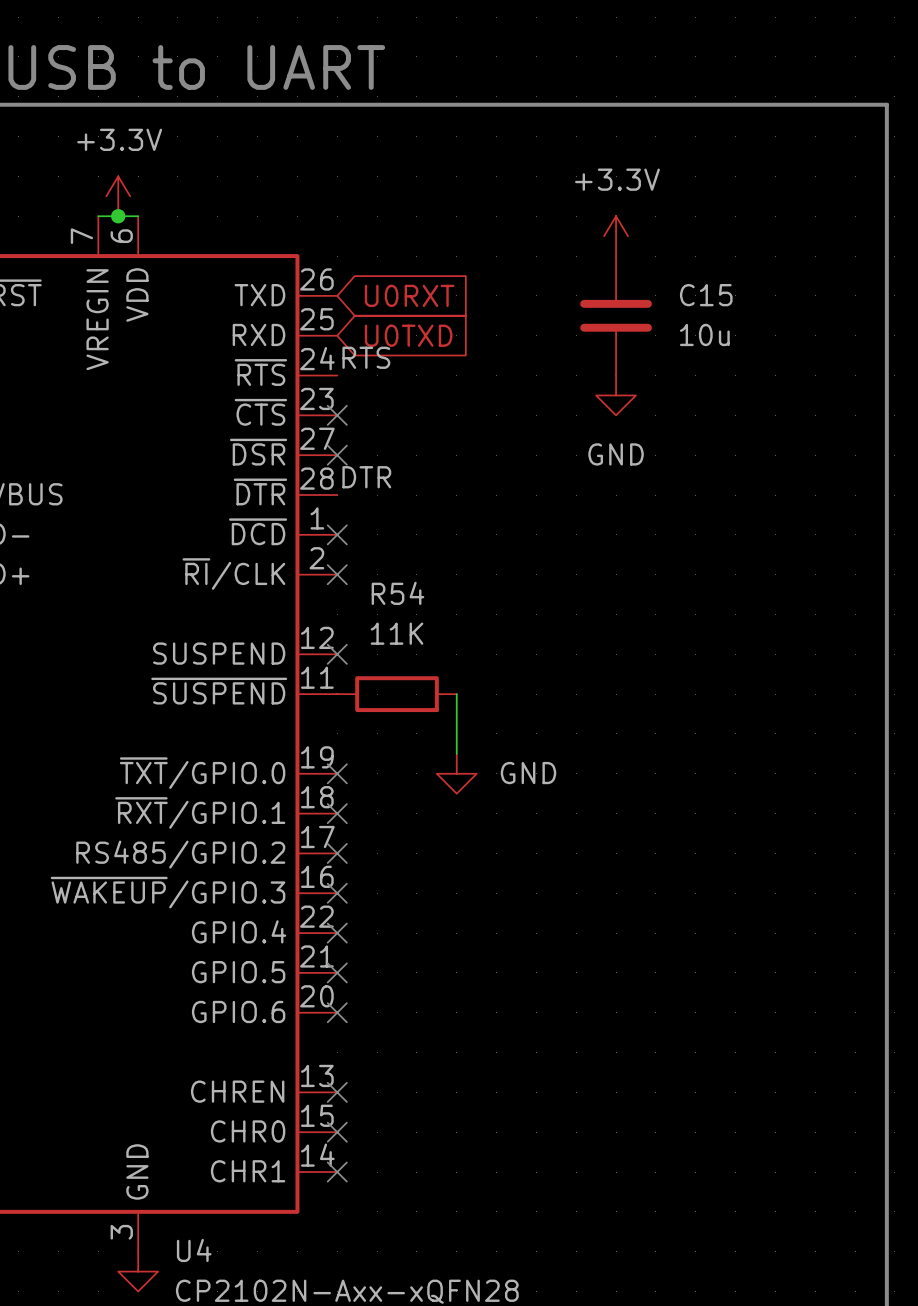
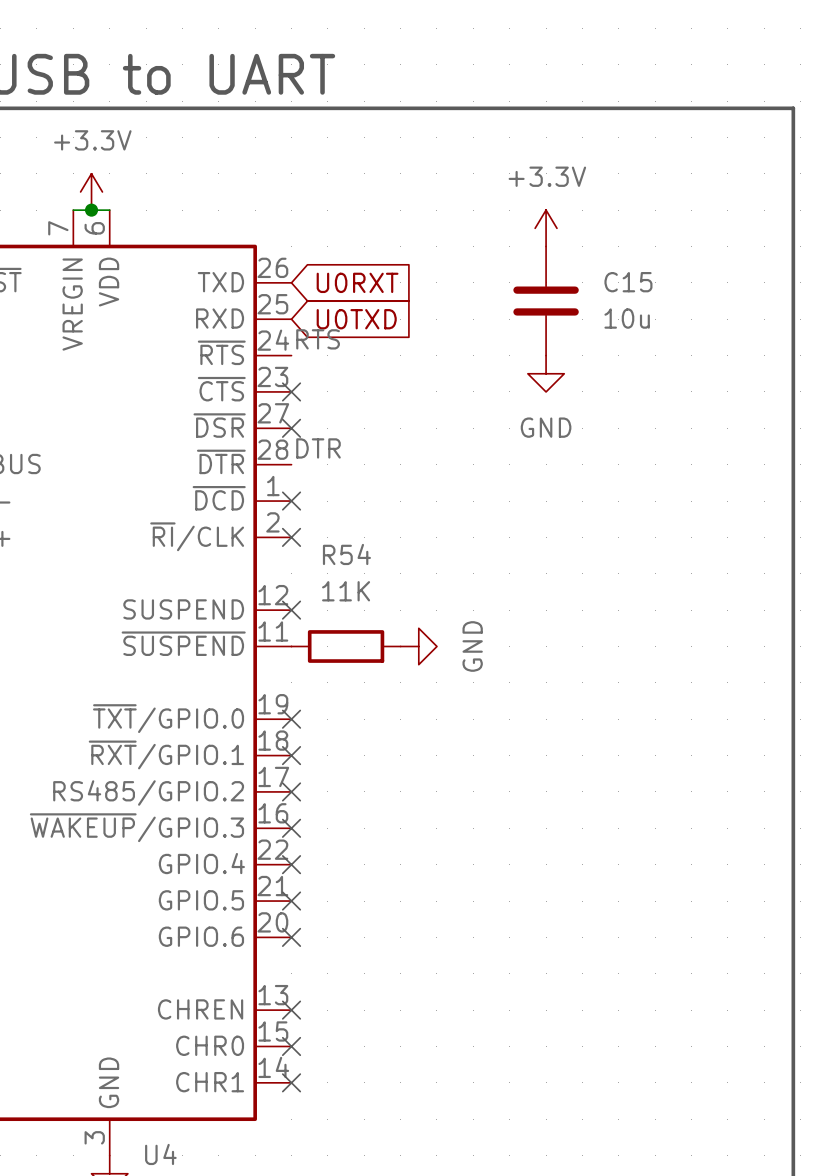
wire: (456, 694) (456, 753) -> none
power symbol rotation: 0° (456, 773) -> 90° counterclockwise (418, 646)
power symbol position: GND (456, 773) -> GND (418, 646)

